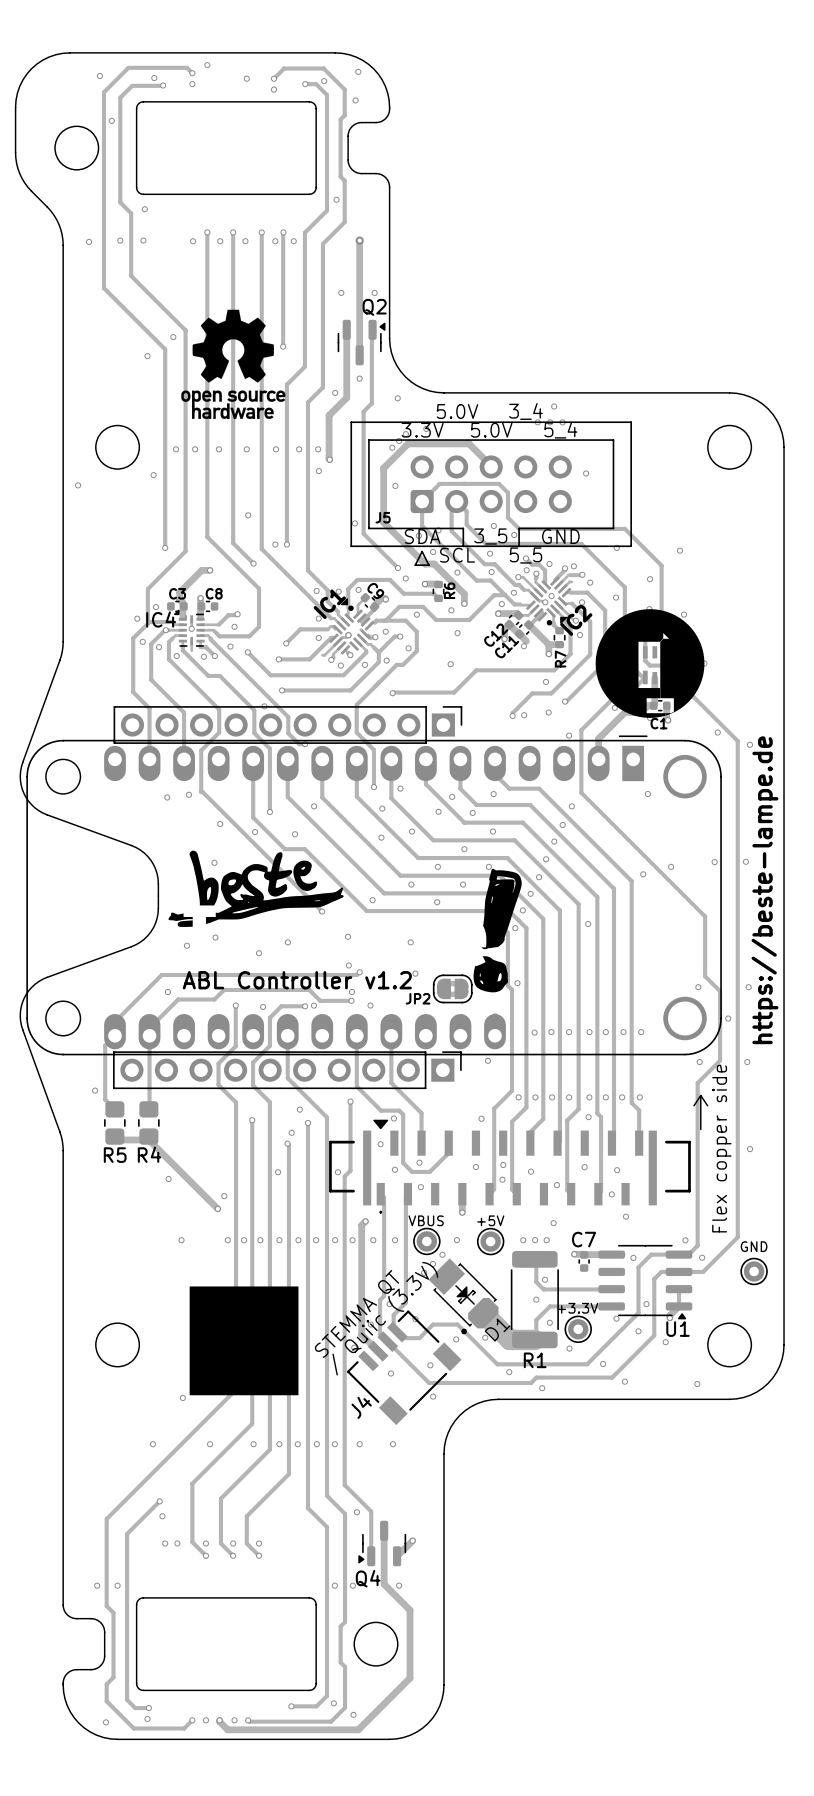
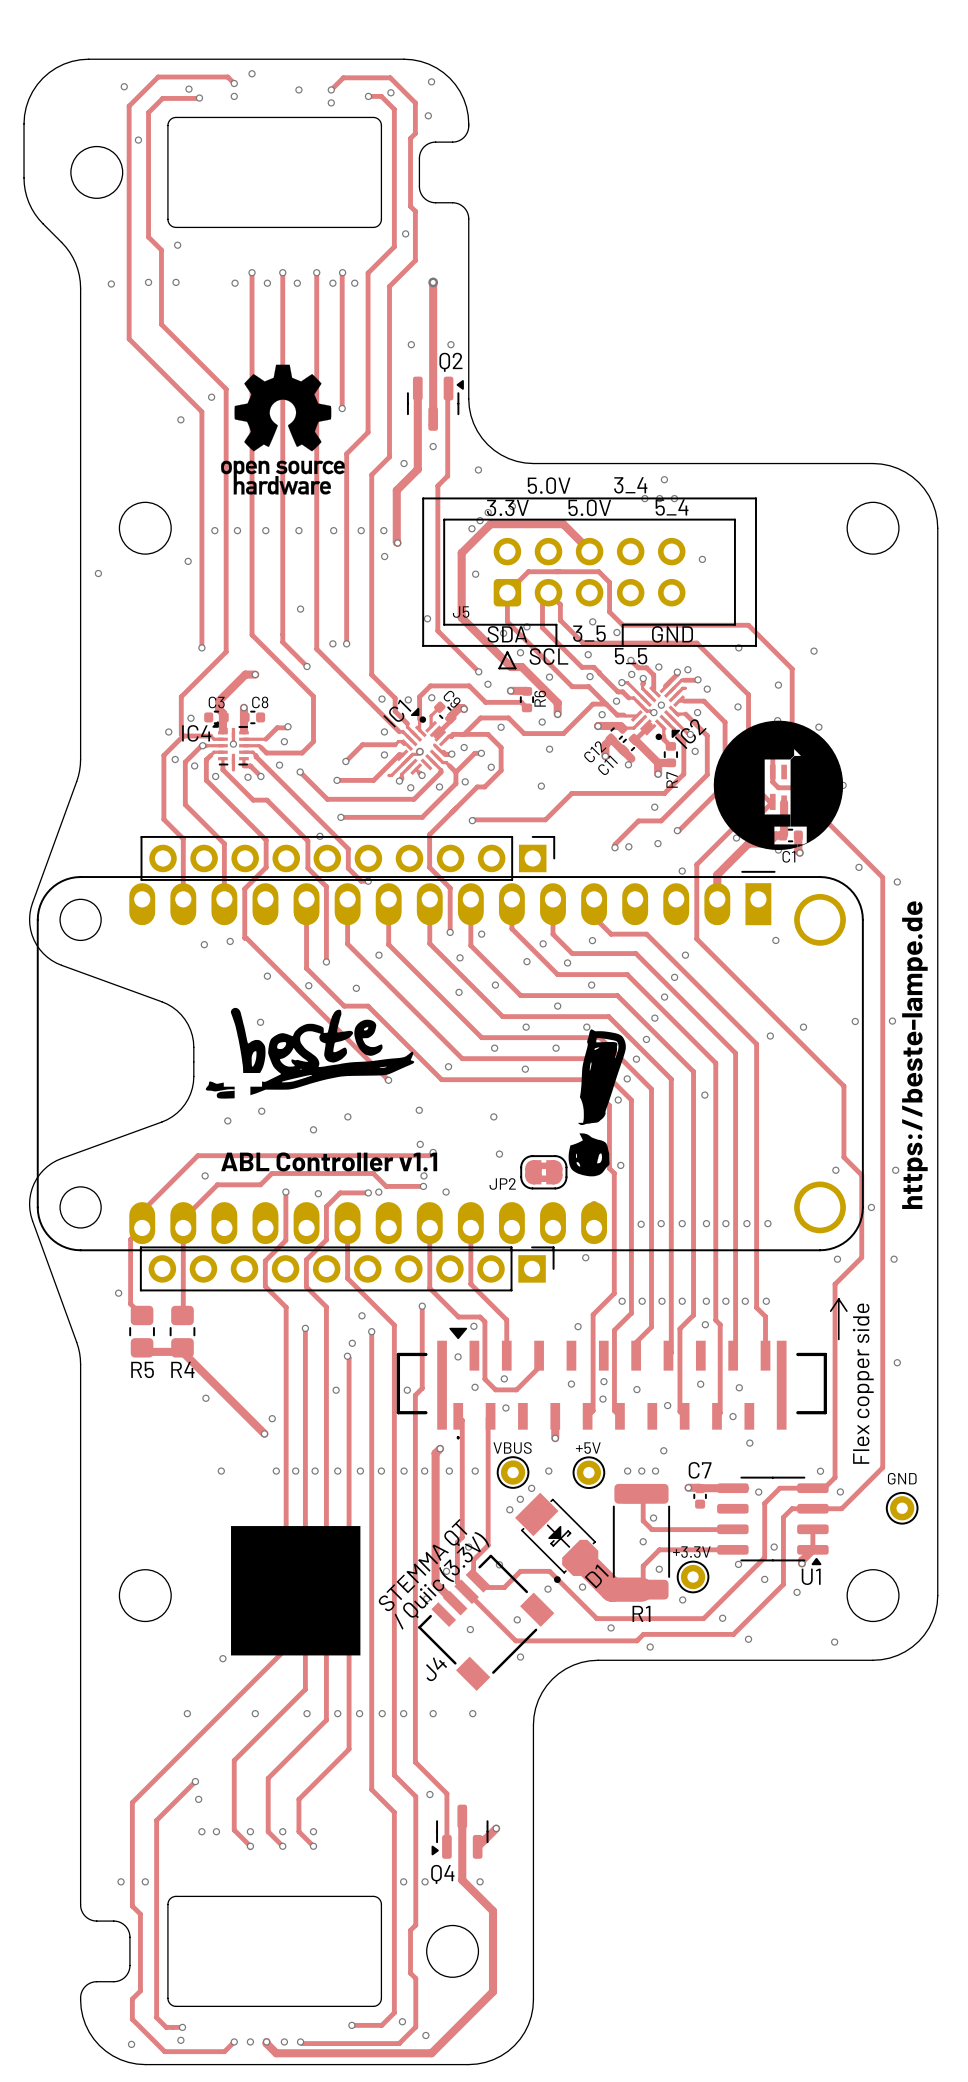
text: ABL Controller v1.2 (297, 980) -> ABL Controller v1.1 (329, 1161)

